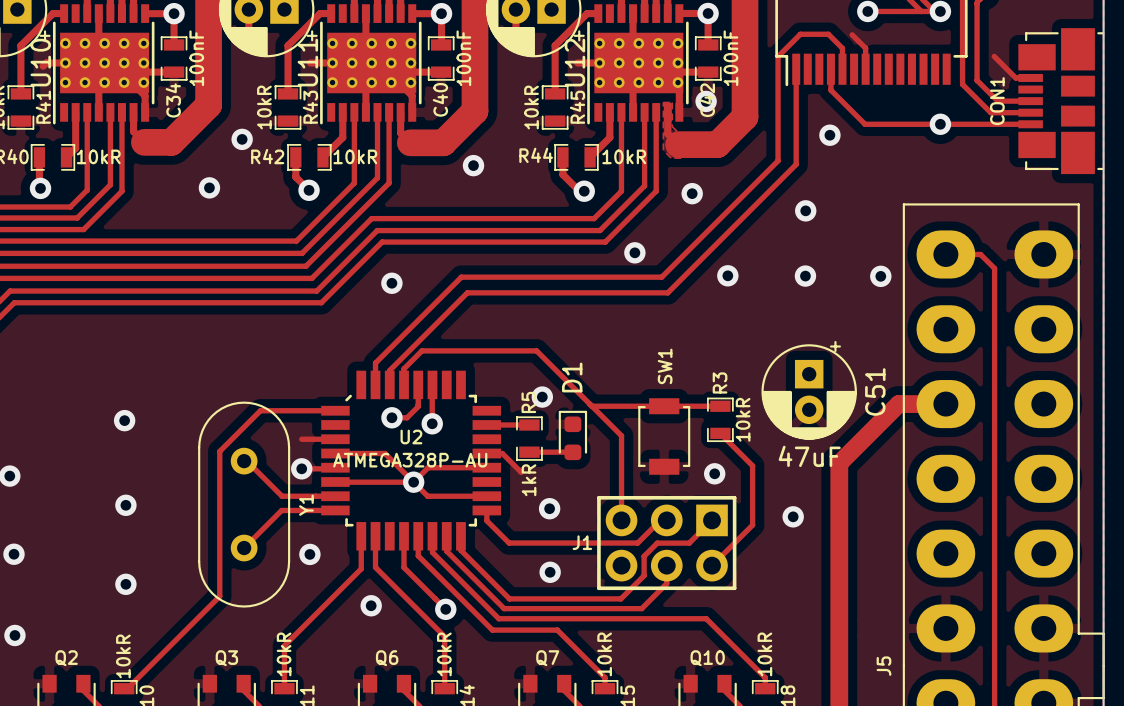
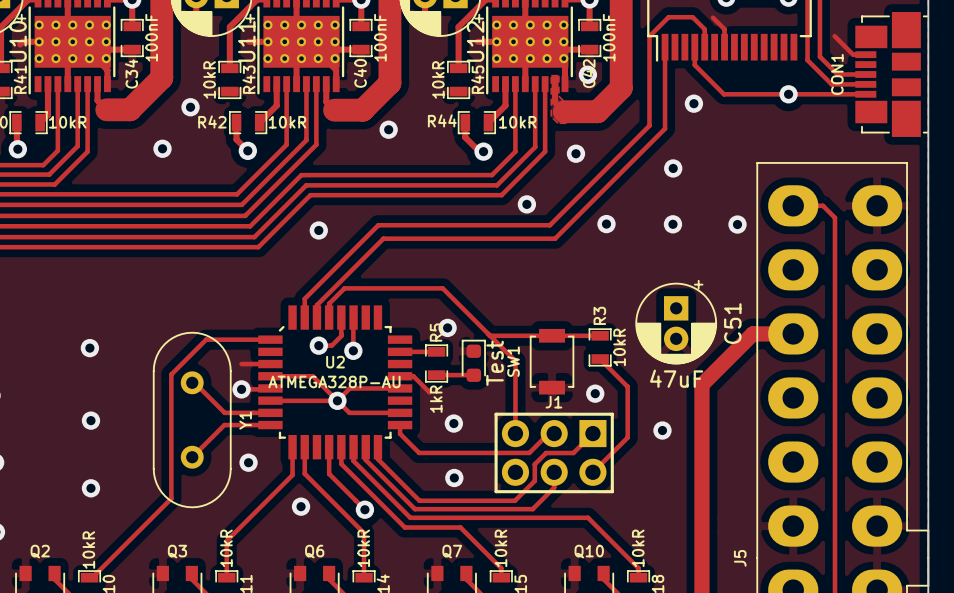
SW1 name position: SW1 (665, 366) -> SW1 (513, 361)
D1 name: D1 (572, 377) -> Test (495, 363)
J1 name position: J1 (582, 542) -> J1 (553, 402)

